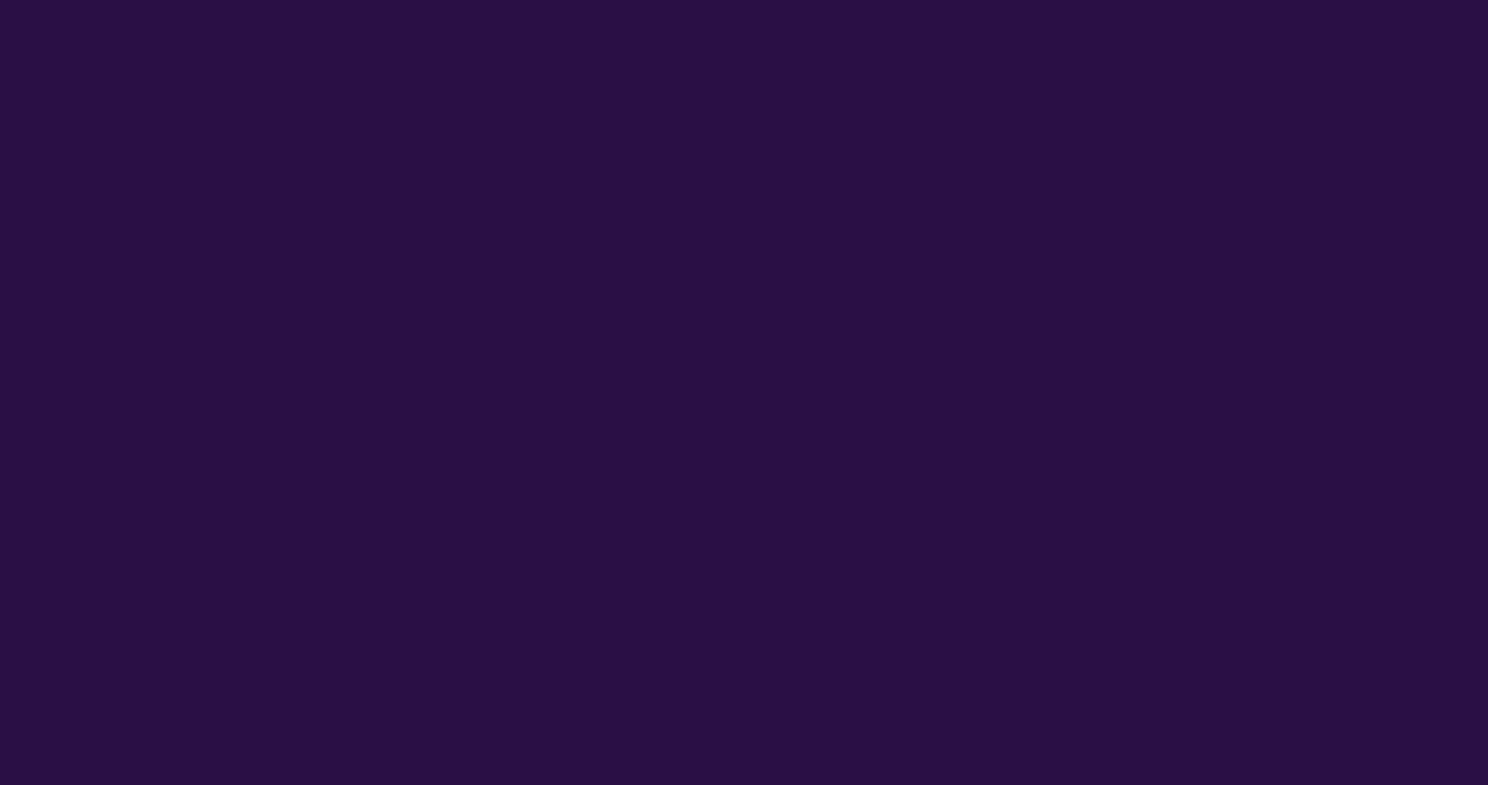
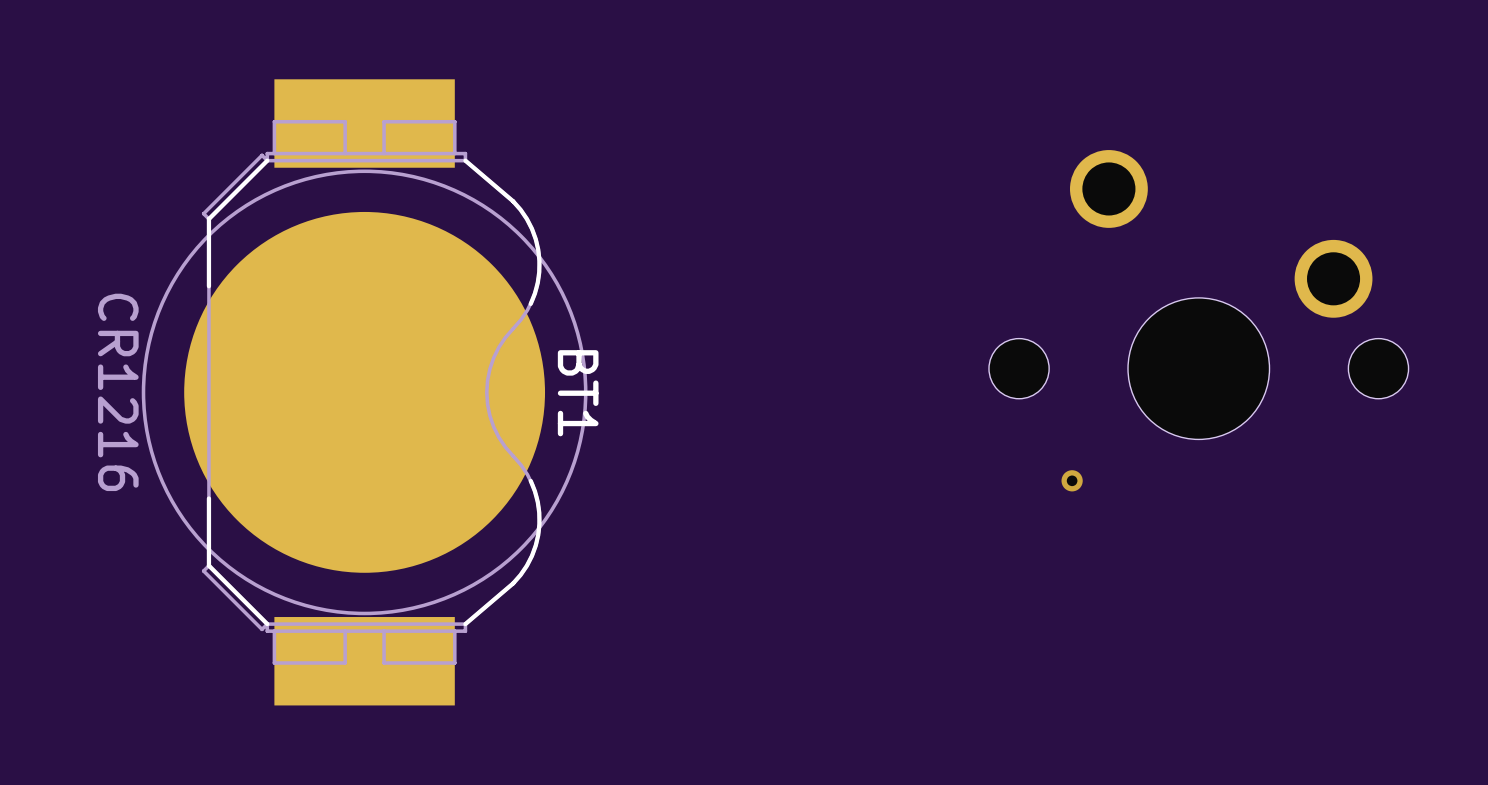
part: none -> (1198, 294)
BT1: none -> CR1216 (364, 392)
via: none -> (1072, 480)

